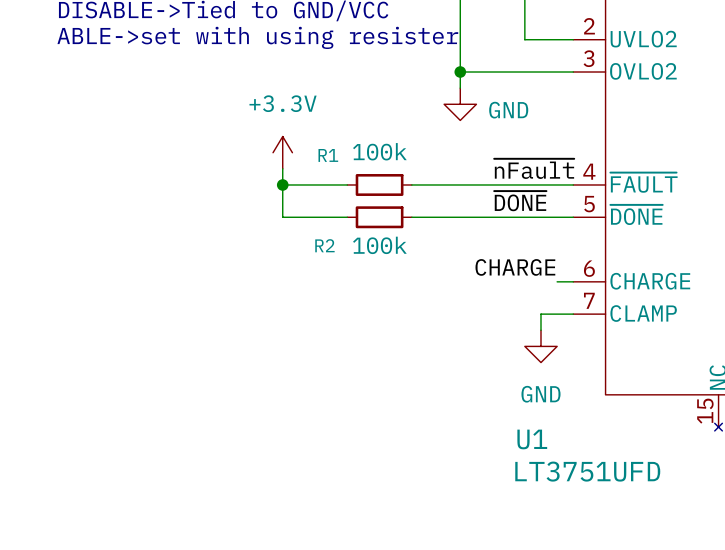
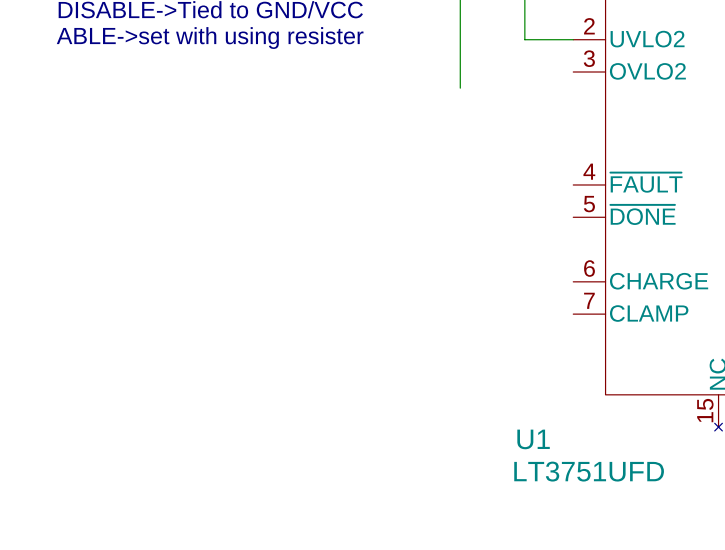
wire: (460, 72) (573, 72) -> none
junction: (460, 72) -> none
power symbol: GND (460, 104) -> none
power symbol: +3.3V (282, 152) -> none
wire: (282, 168) (282, 217) (347, 217) -> none
label: ~{nFault} (534, 168) -> none
wire: (282, 184) (347, 184) -> none
junction: (282, 184) -> none
R1: 100k (379, 184) -> none
wire: (411, 184) (573, 184) -> none
label: ~{DONE} (520, 201) -> none
R2: 100k (379, 217) -> none
wire: (411, 217) (573, 217) -> none
label: CHARGE (515, 267) -> none
wire: (557, 281) (573, 281) -> none
wire: (573, 314) (540, 314) (540, 330) -> none
power symbol: GND (540, 346) -> none

